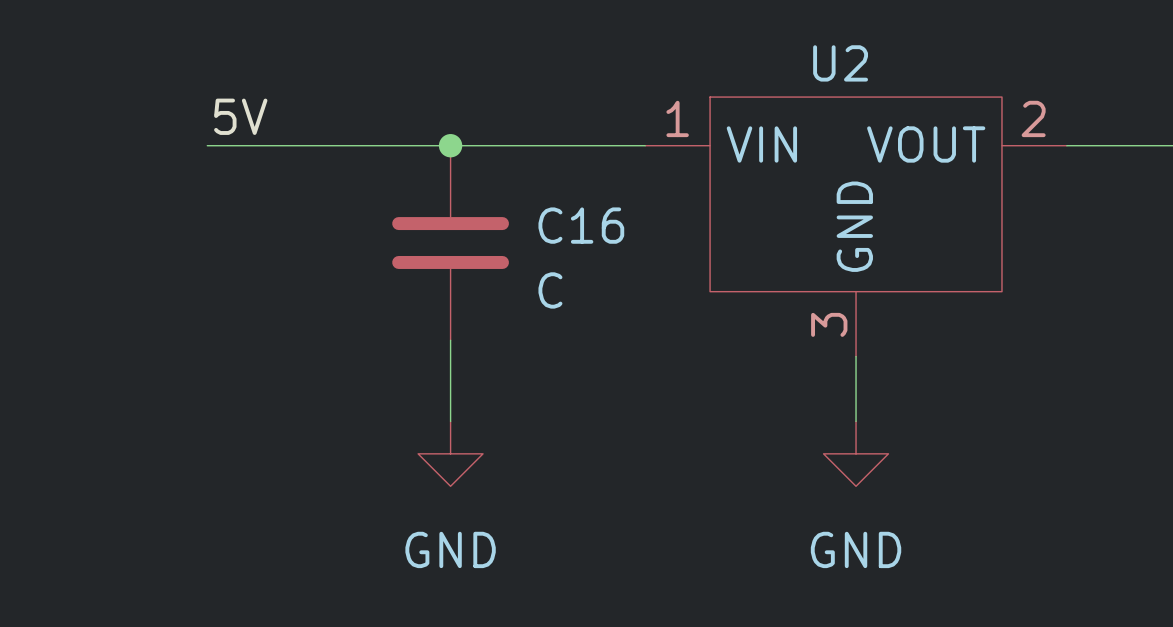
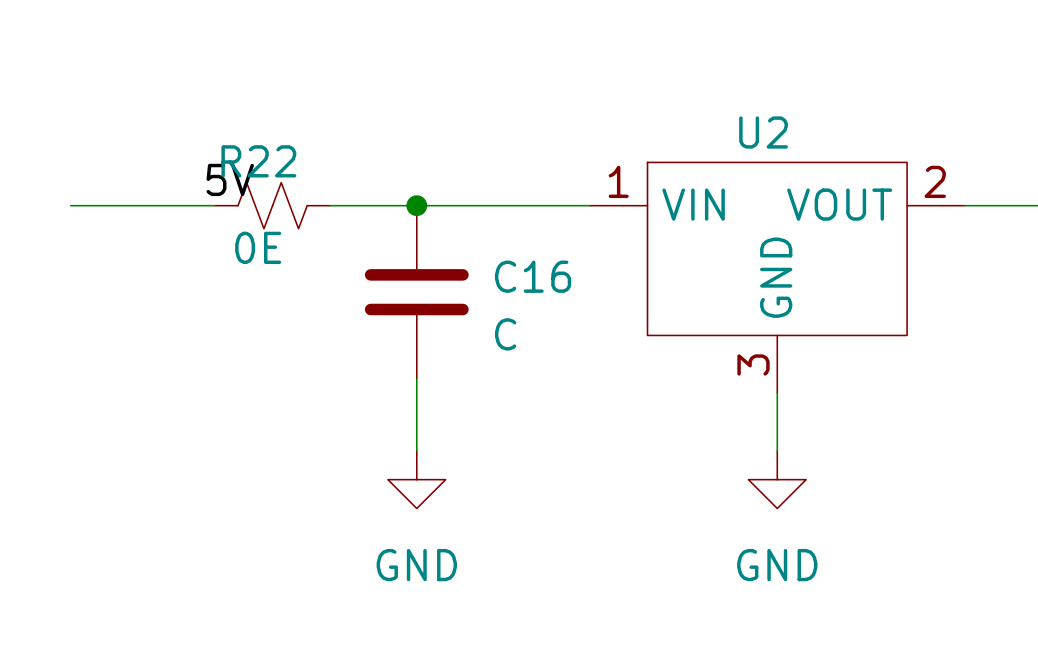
wire: none -> (70, 205) (200, 205)
wire: (223, 145) (353, 145) -> none
R22: none -> 0E (272, 205)

